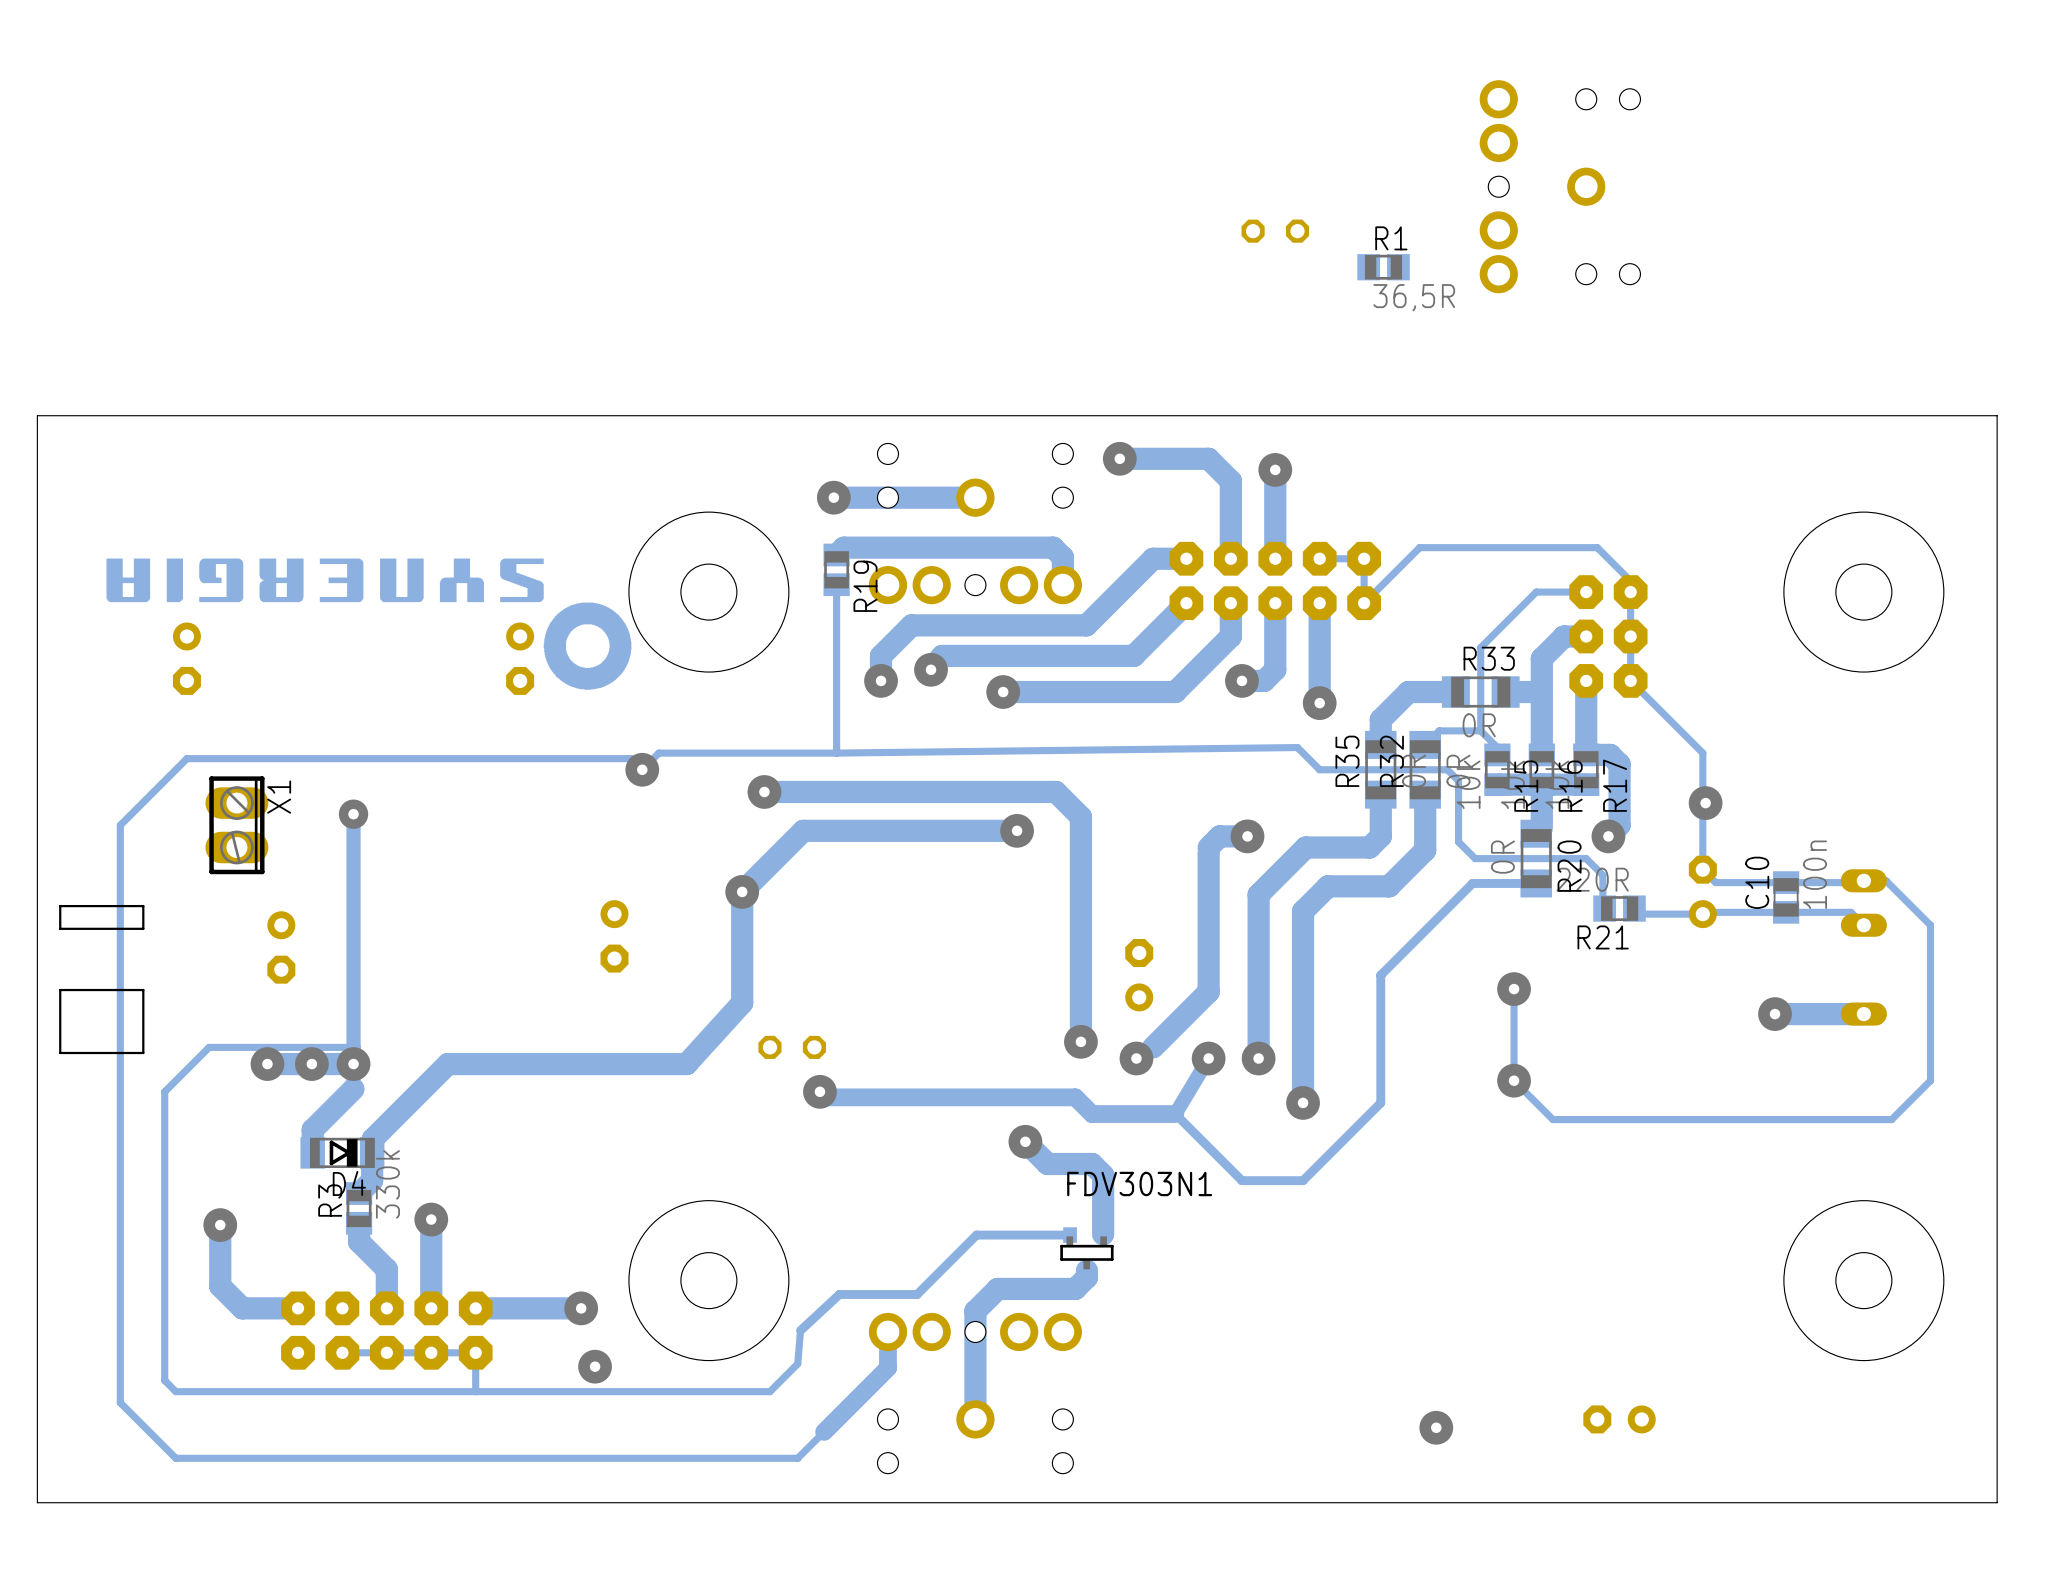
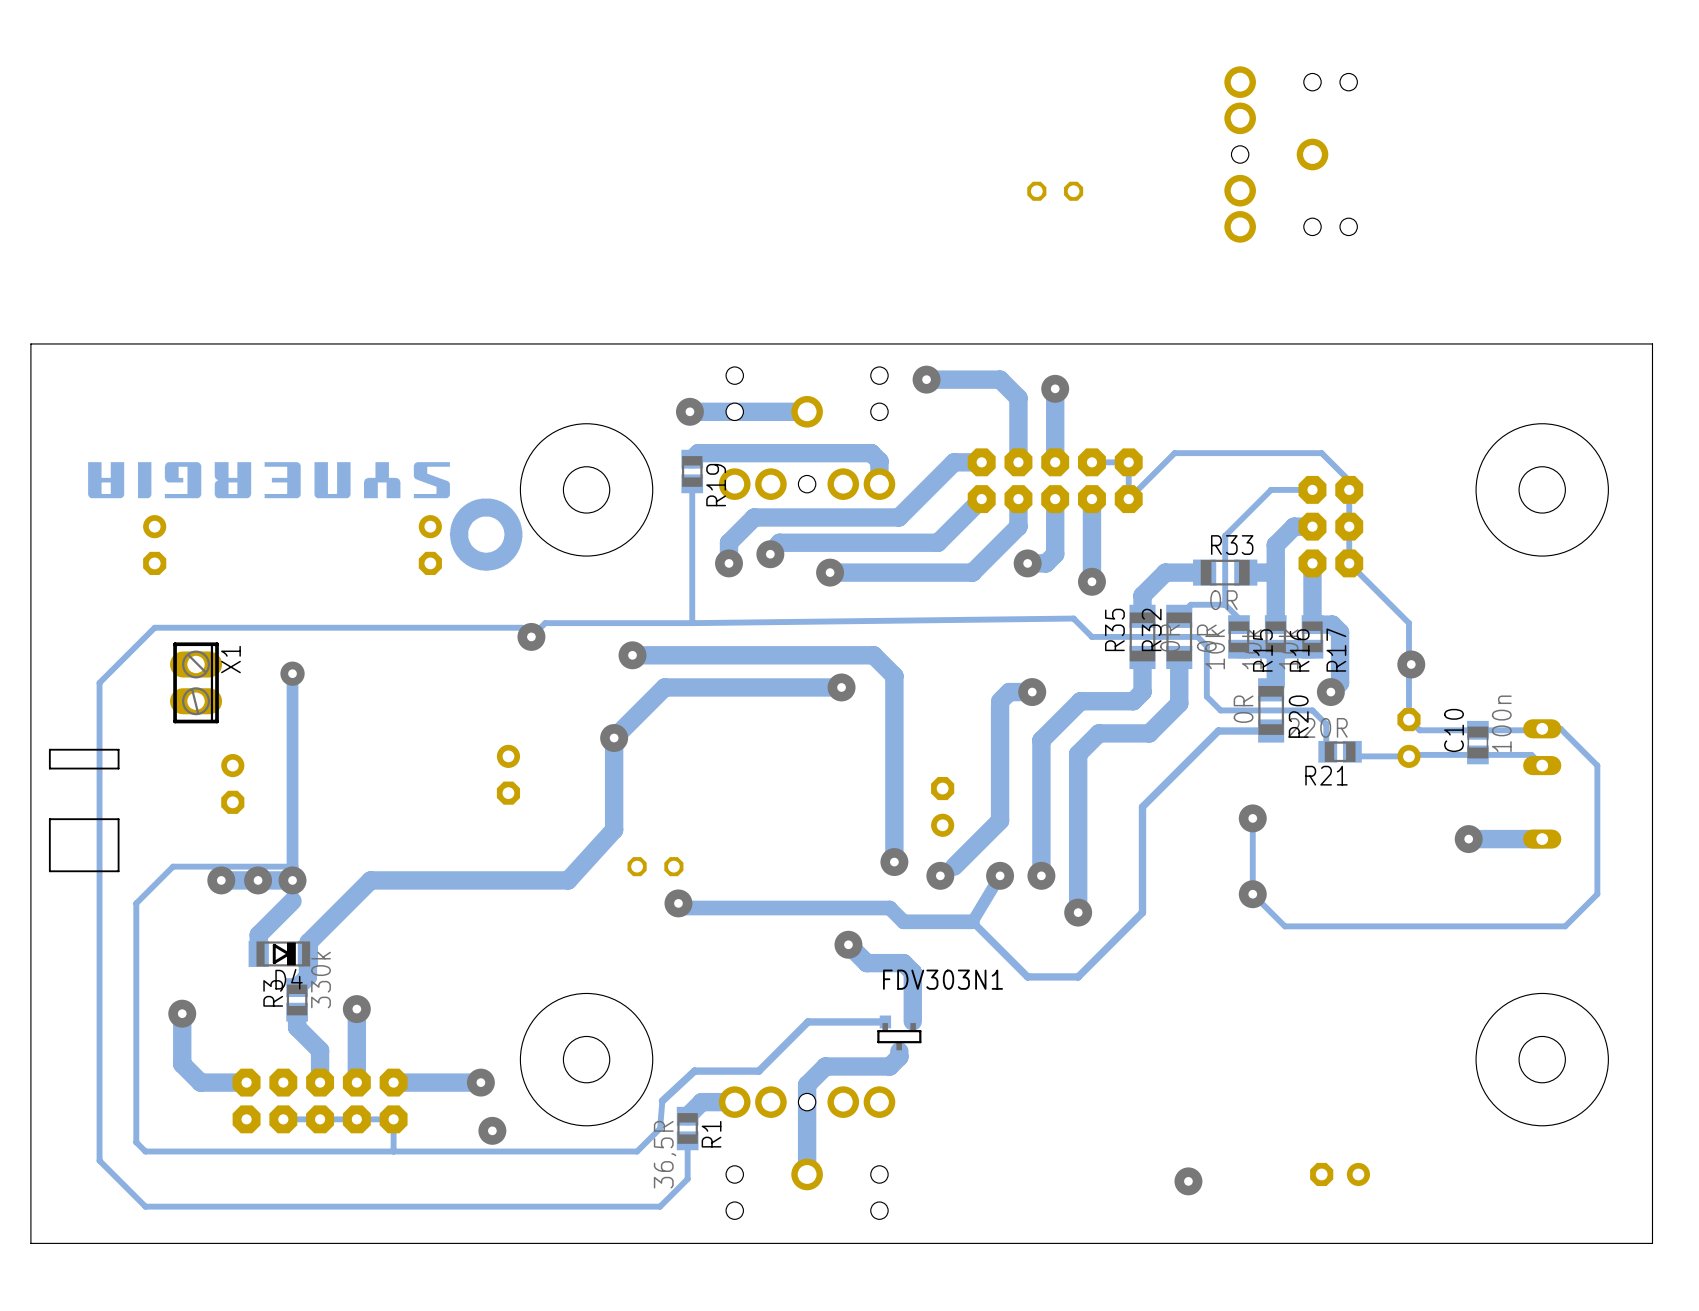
R1 rotation: 0° (1383, 267) -> 90° clockwise (687, 1128)
R1 position: (1383, 267) -> (687, 1128)
track: (887, 1331) (887, 1368) (824, 1431) -> (734, 1102) (701, 1102) (687, 1116)
track: none -> (687, 1140) (687, 1179)

